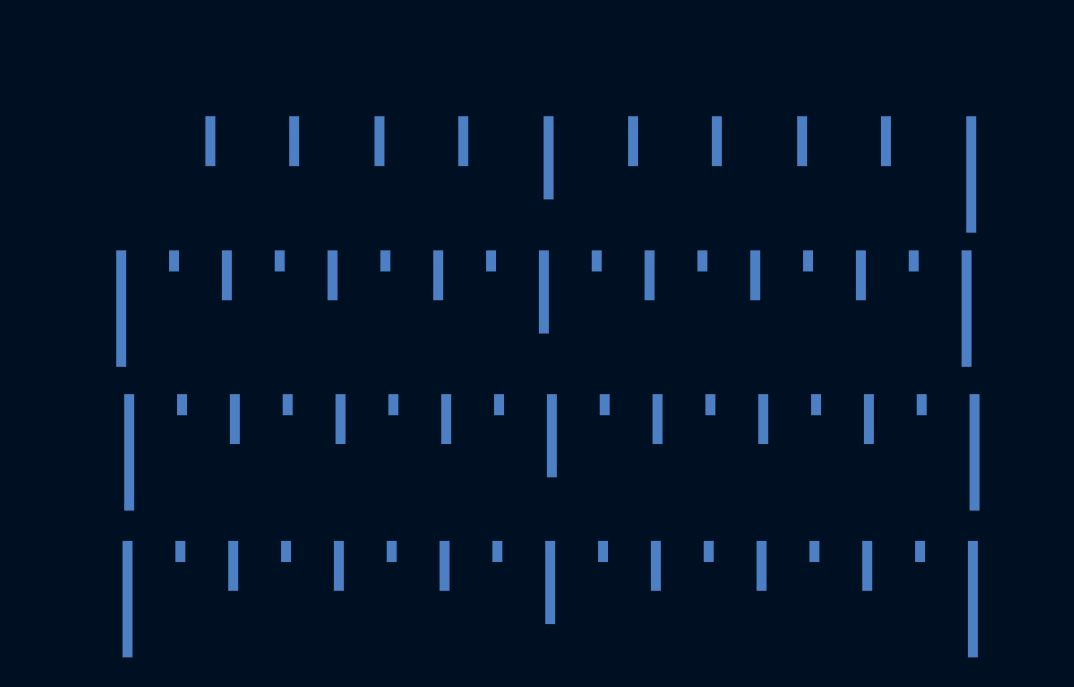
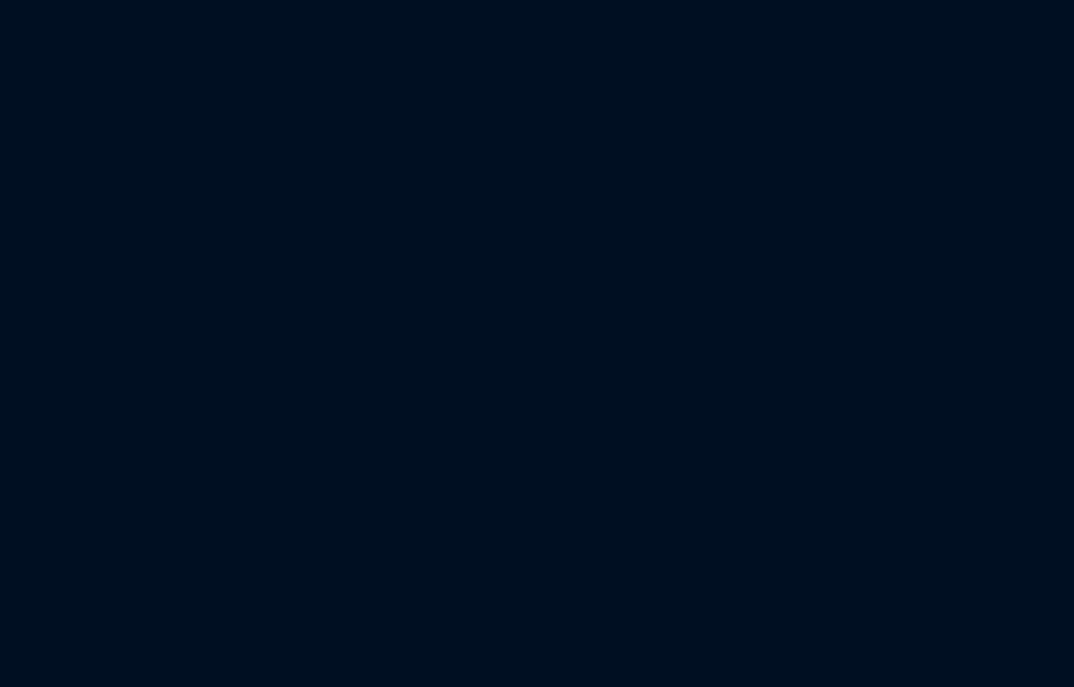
drawing: [116, 116, 980, 658] -> none

